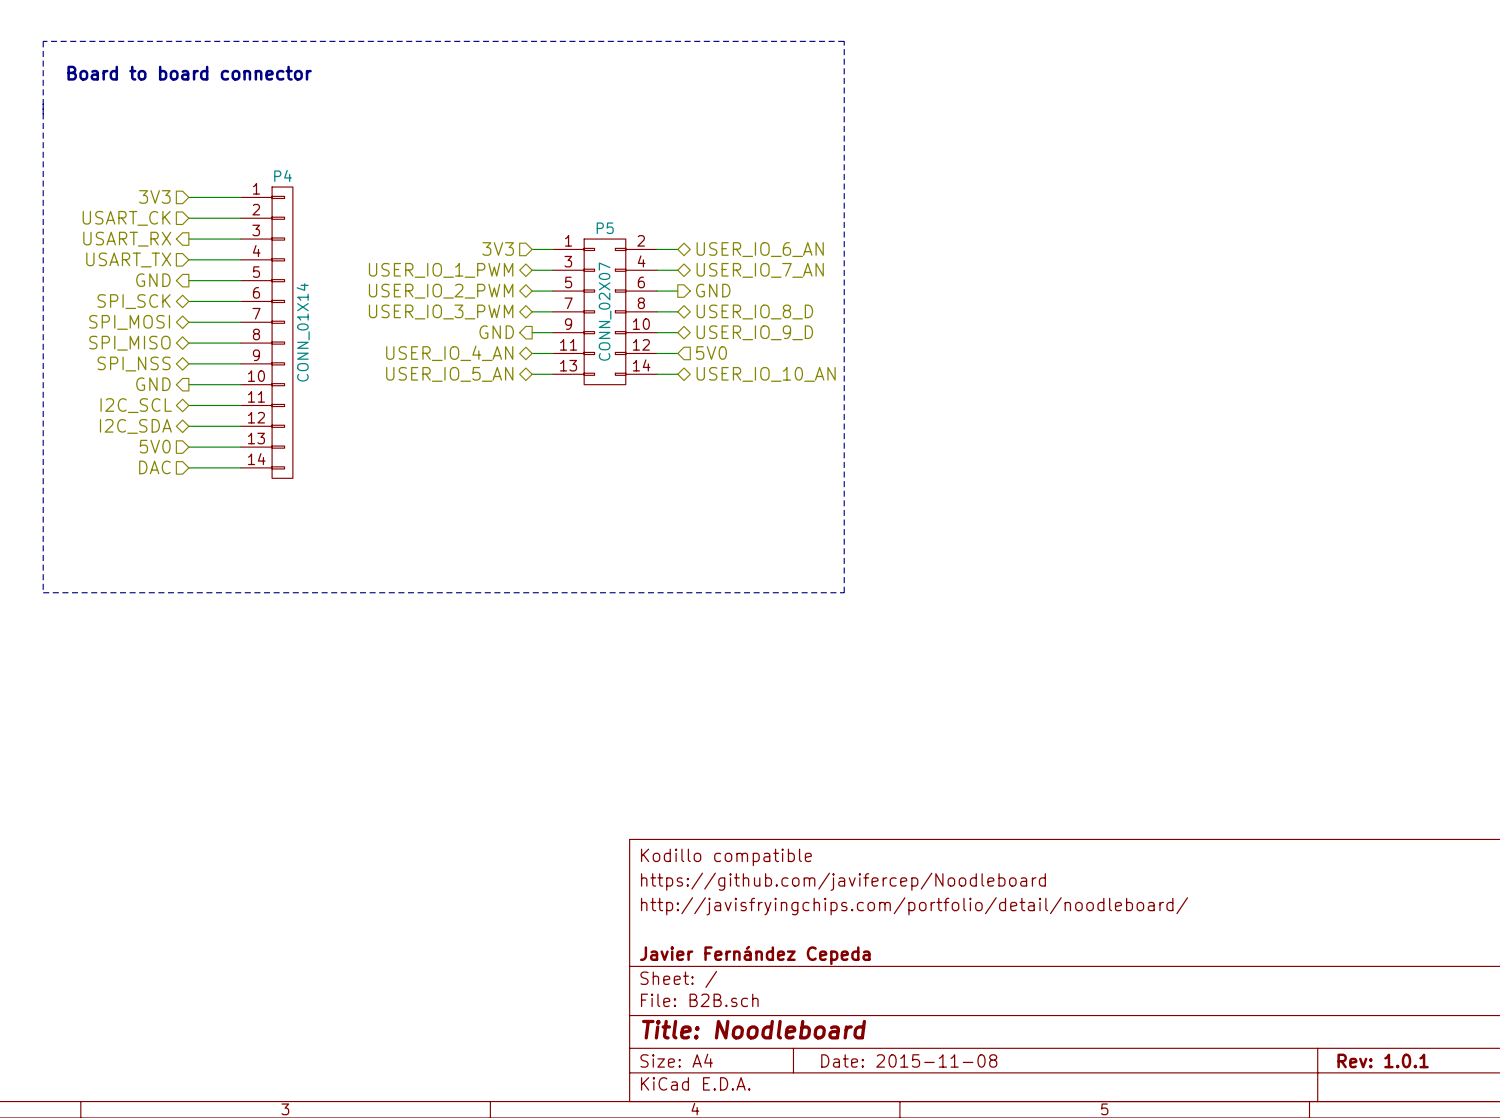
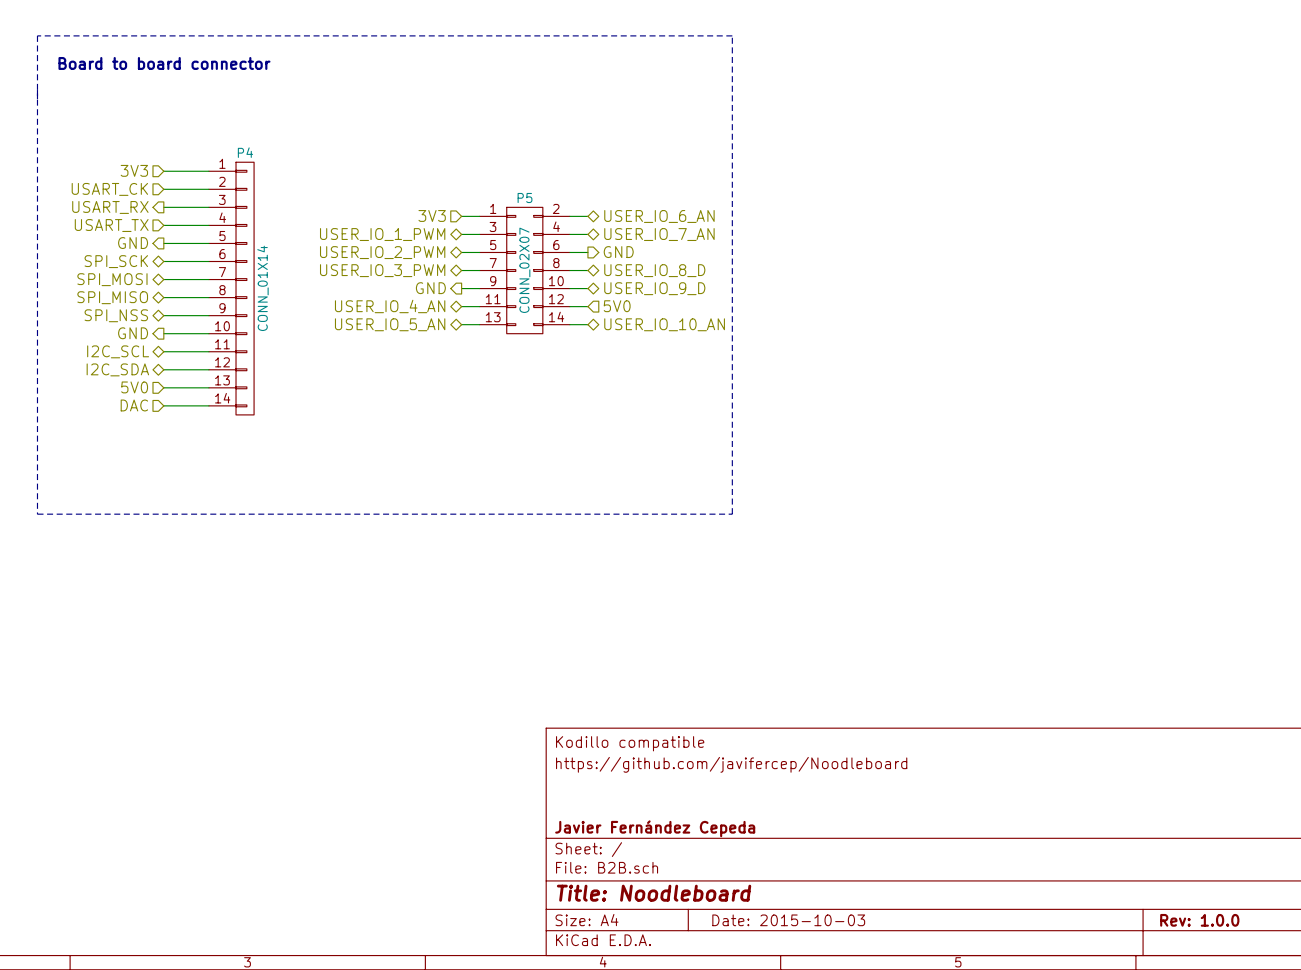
title block: http://javisfryingchips.com/portfolio/detail/noodleboard/ (914, 906) -> none
title block: Date: 2015-11-08 (909, 1060) -> Date: 2015-10-03 (788, 920)
title block: Rev: 1.0.1 (1383, 1060) -> Rev: 1.0.0 (1199, 920)

